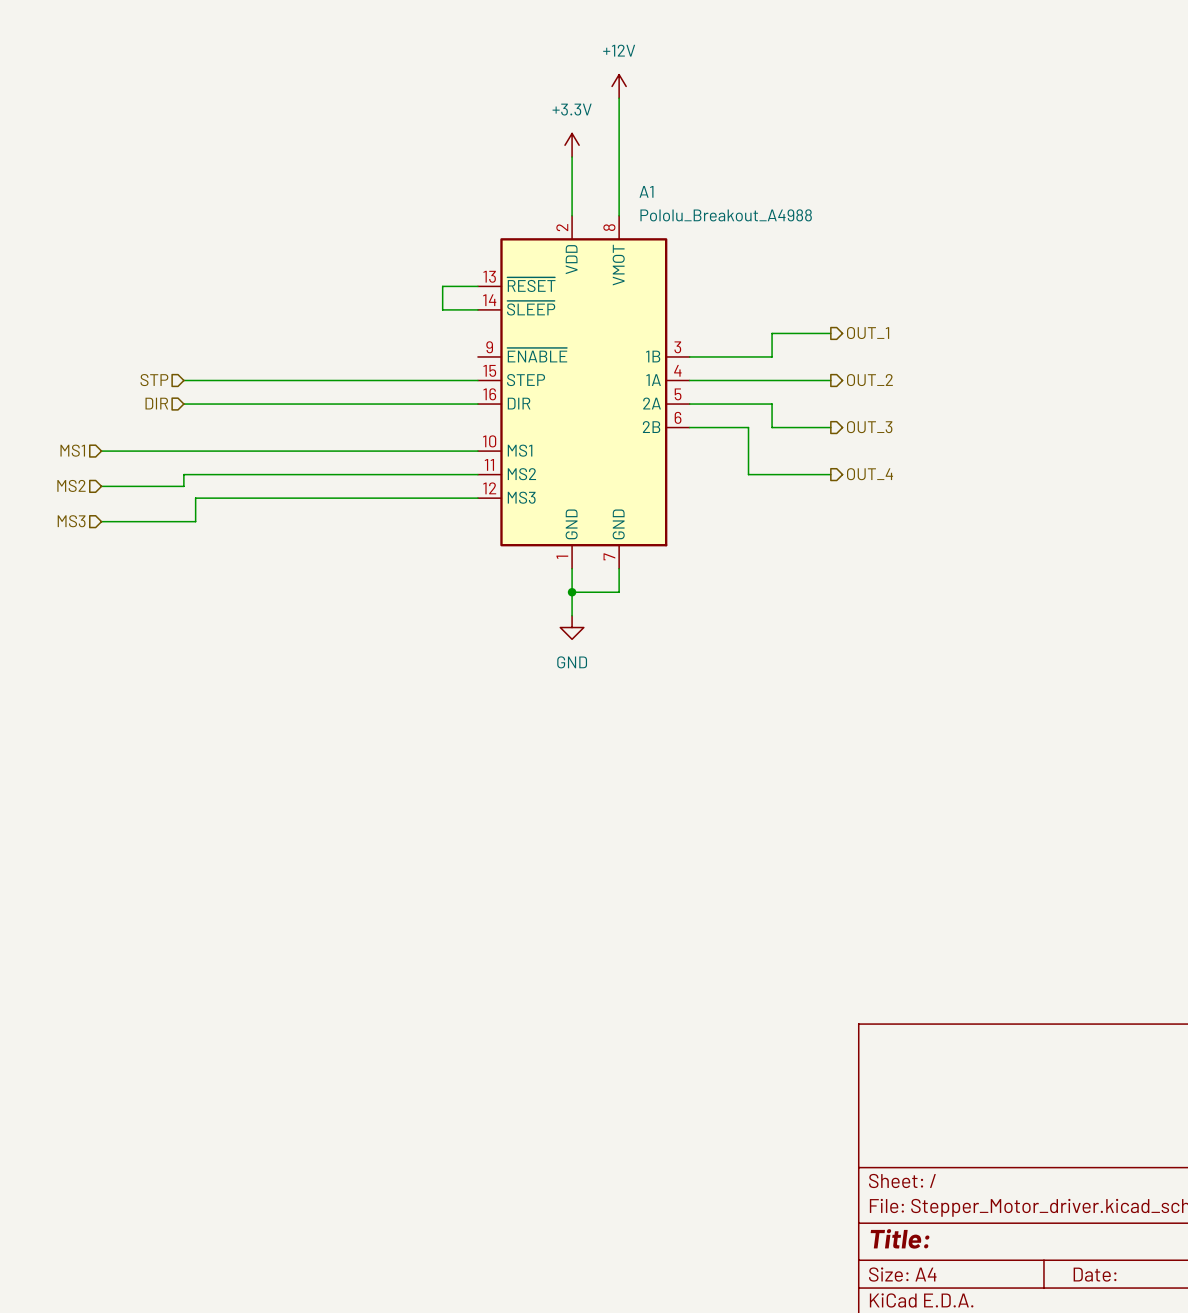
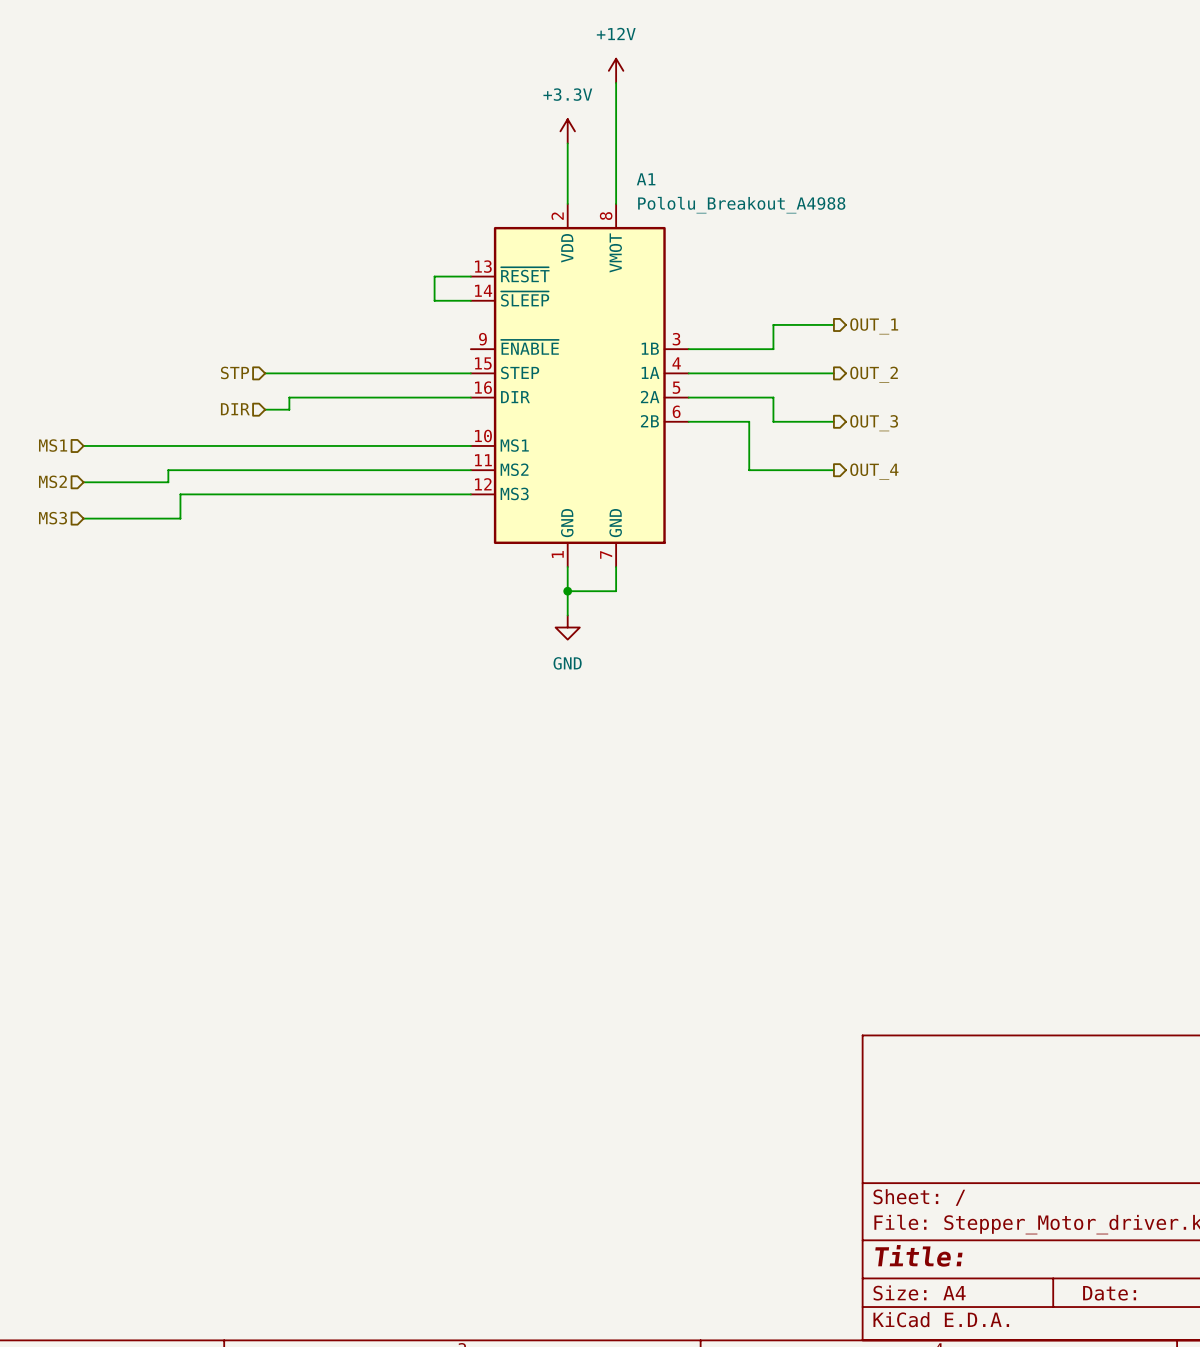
hierarchical label position: STP (154, 380) -> STP (234, 372)
wire: (183, 380) (277, 380) -> none
hierarchical label position: DIR (156, 403) -> DIR (235, 409)
wire: (183, 404) (301, 404) -> (265, 409) (289, 409) (289, 397)

